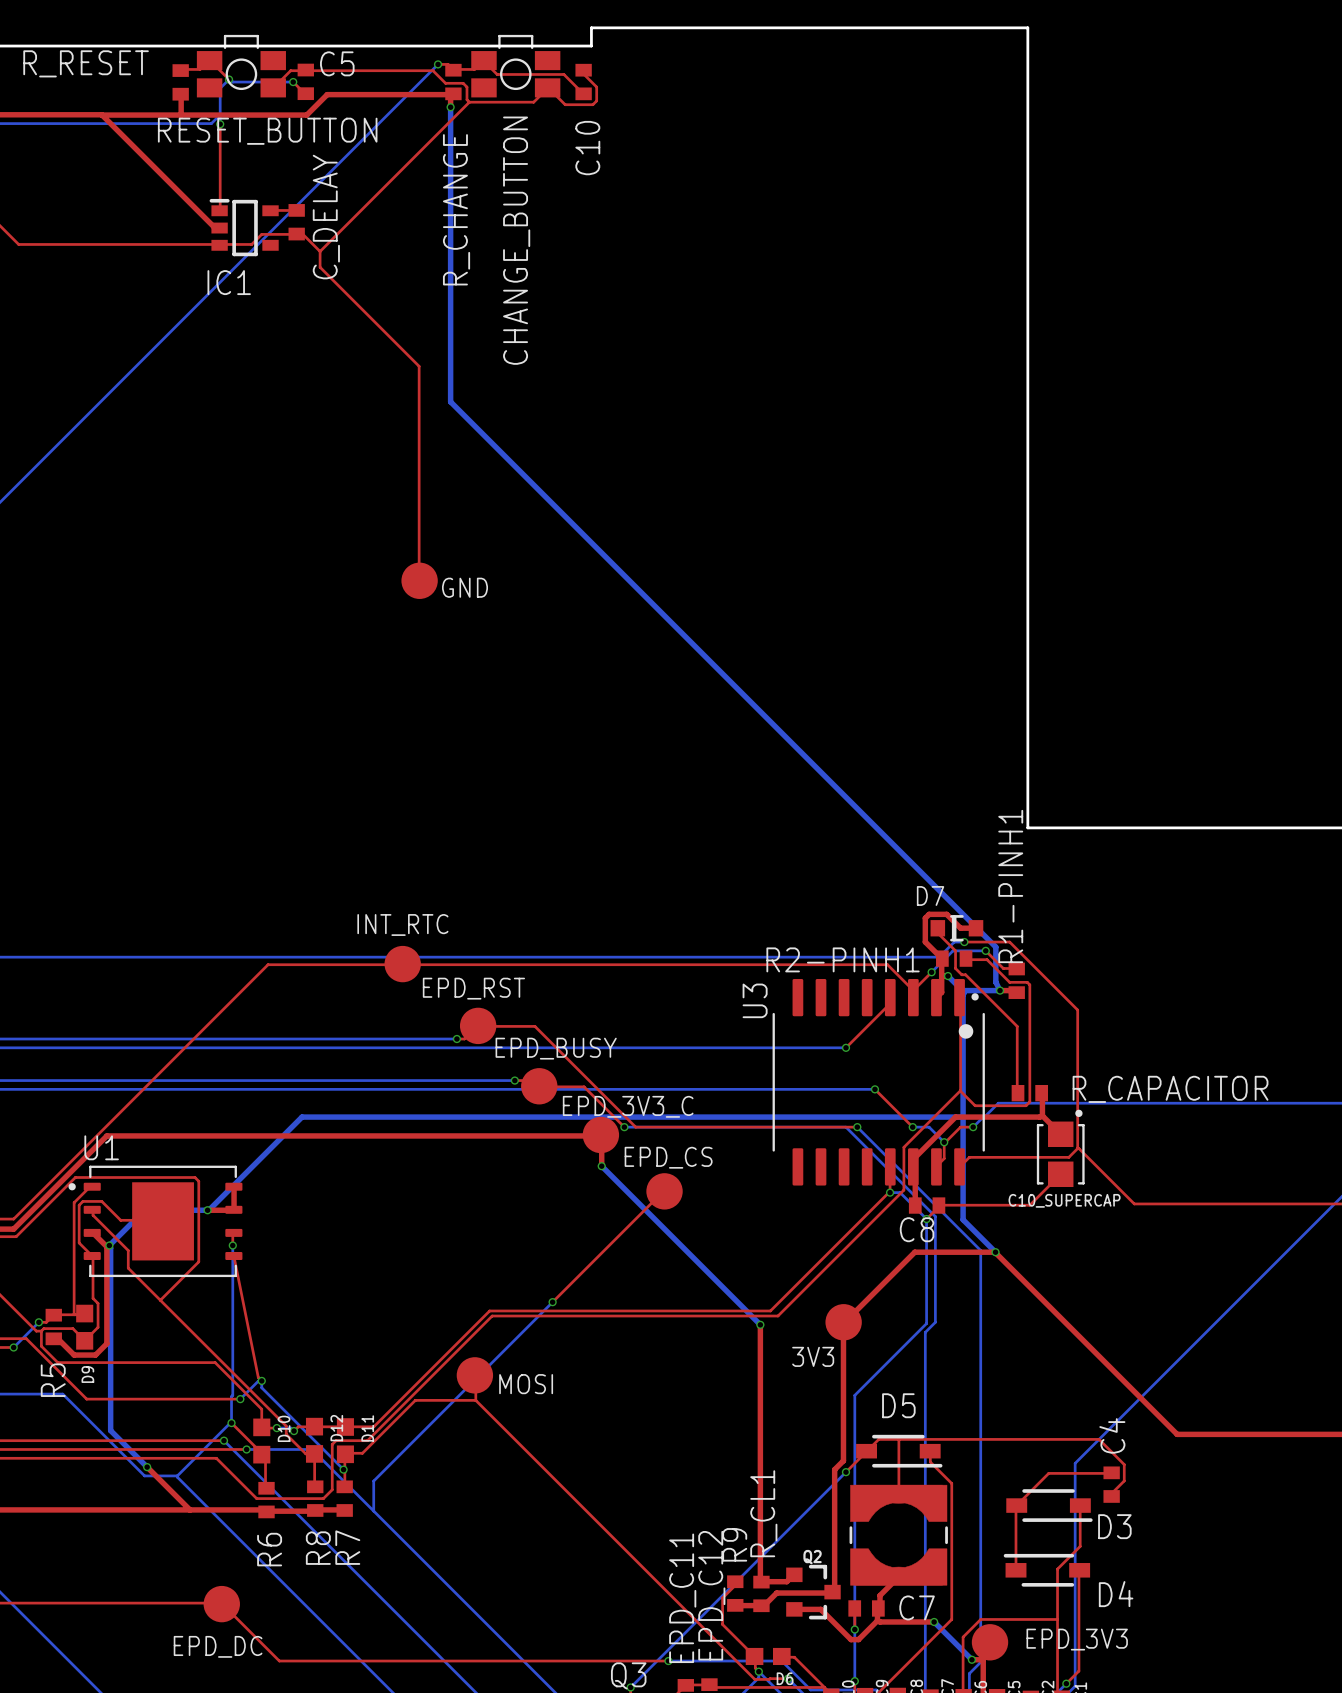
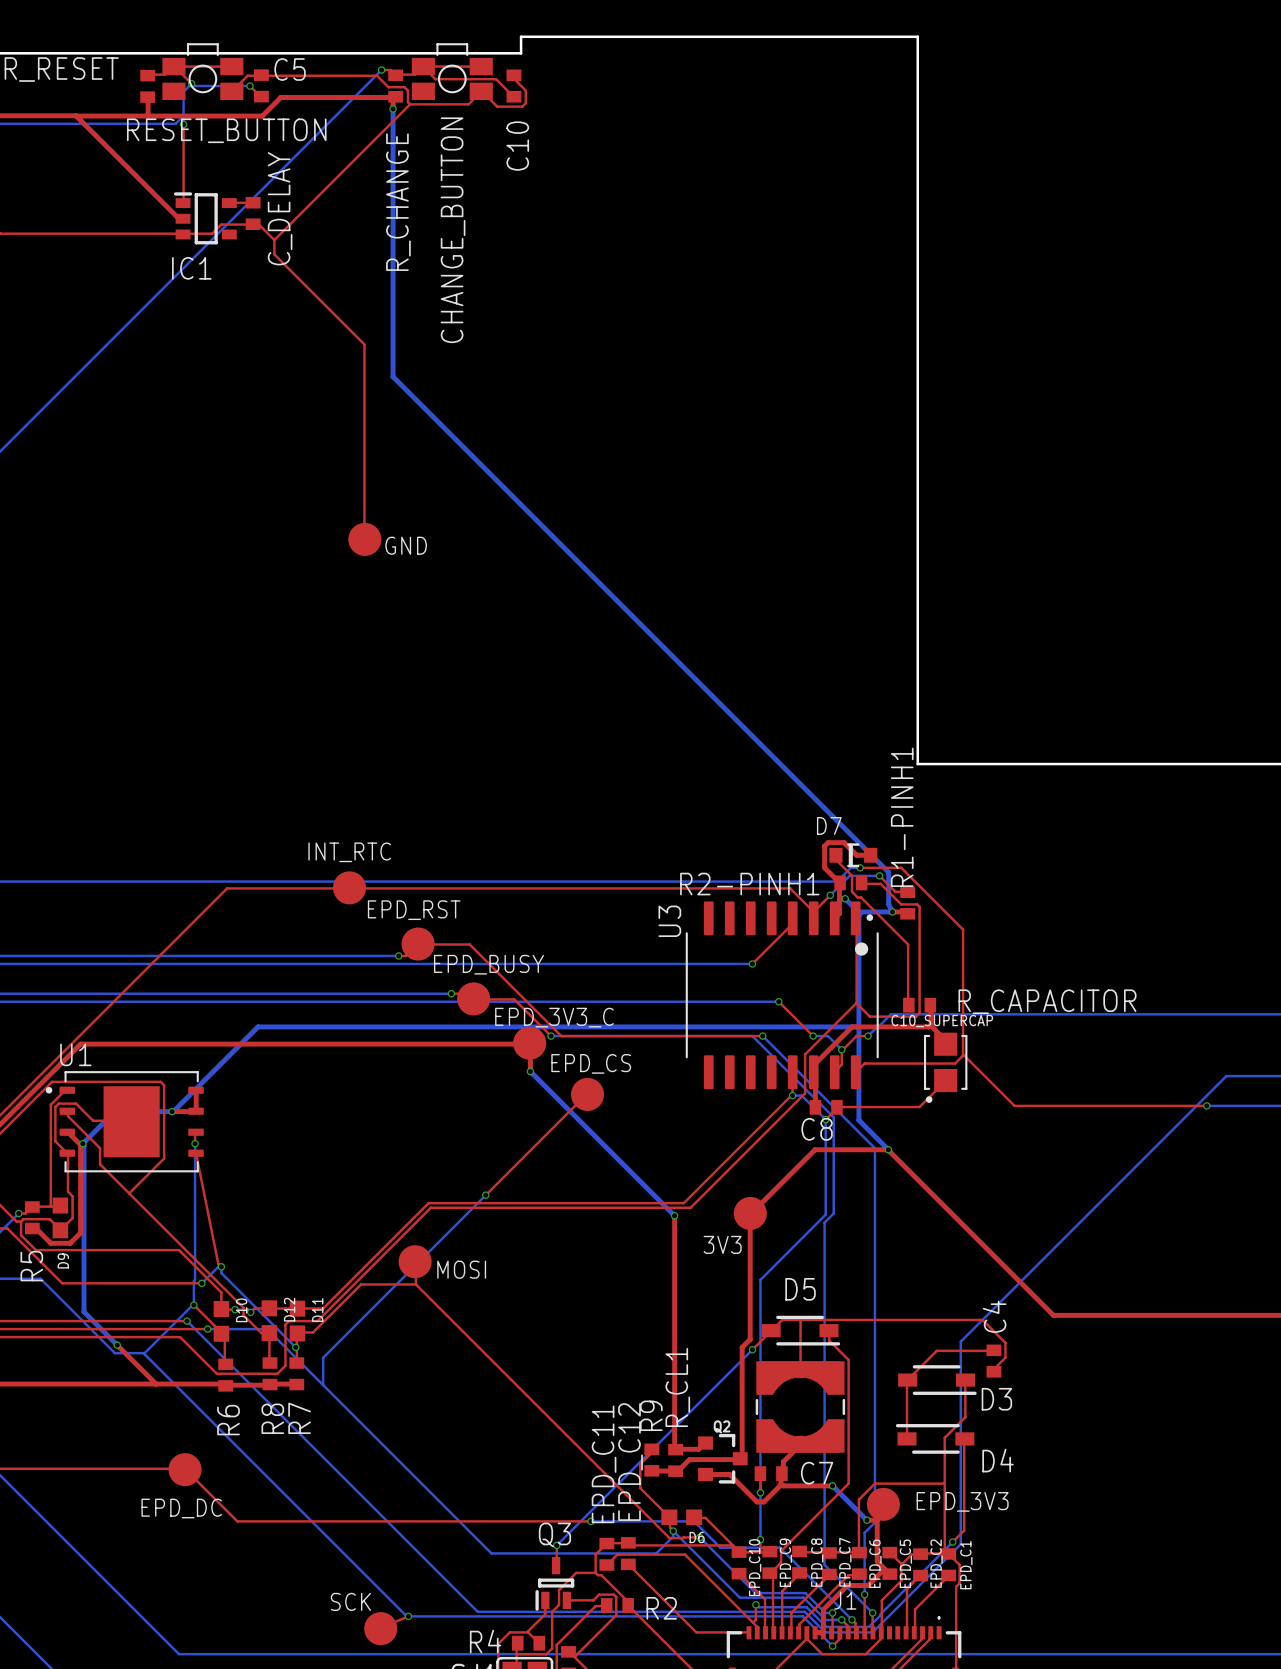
top track: none -> (173, 66) (231, 66)
top track: none -> (481, 66) (426, 66) (424, 68)
C10_SUPERCAP rotation: 0° (1060, 1148) -> 180° (945, 1067)

